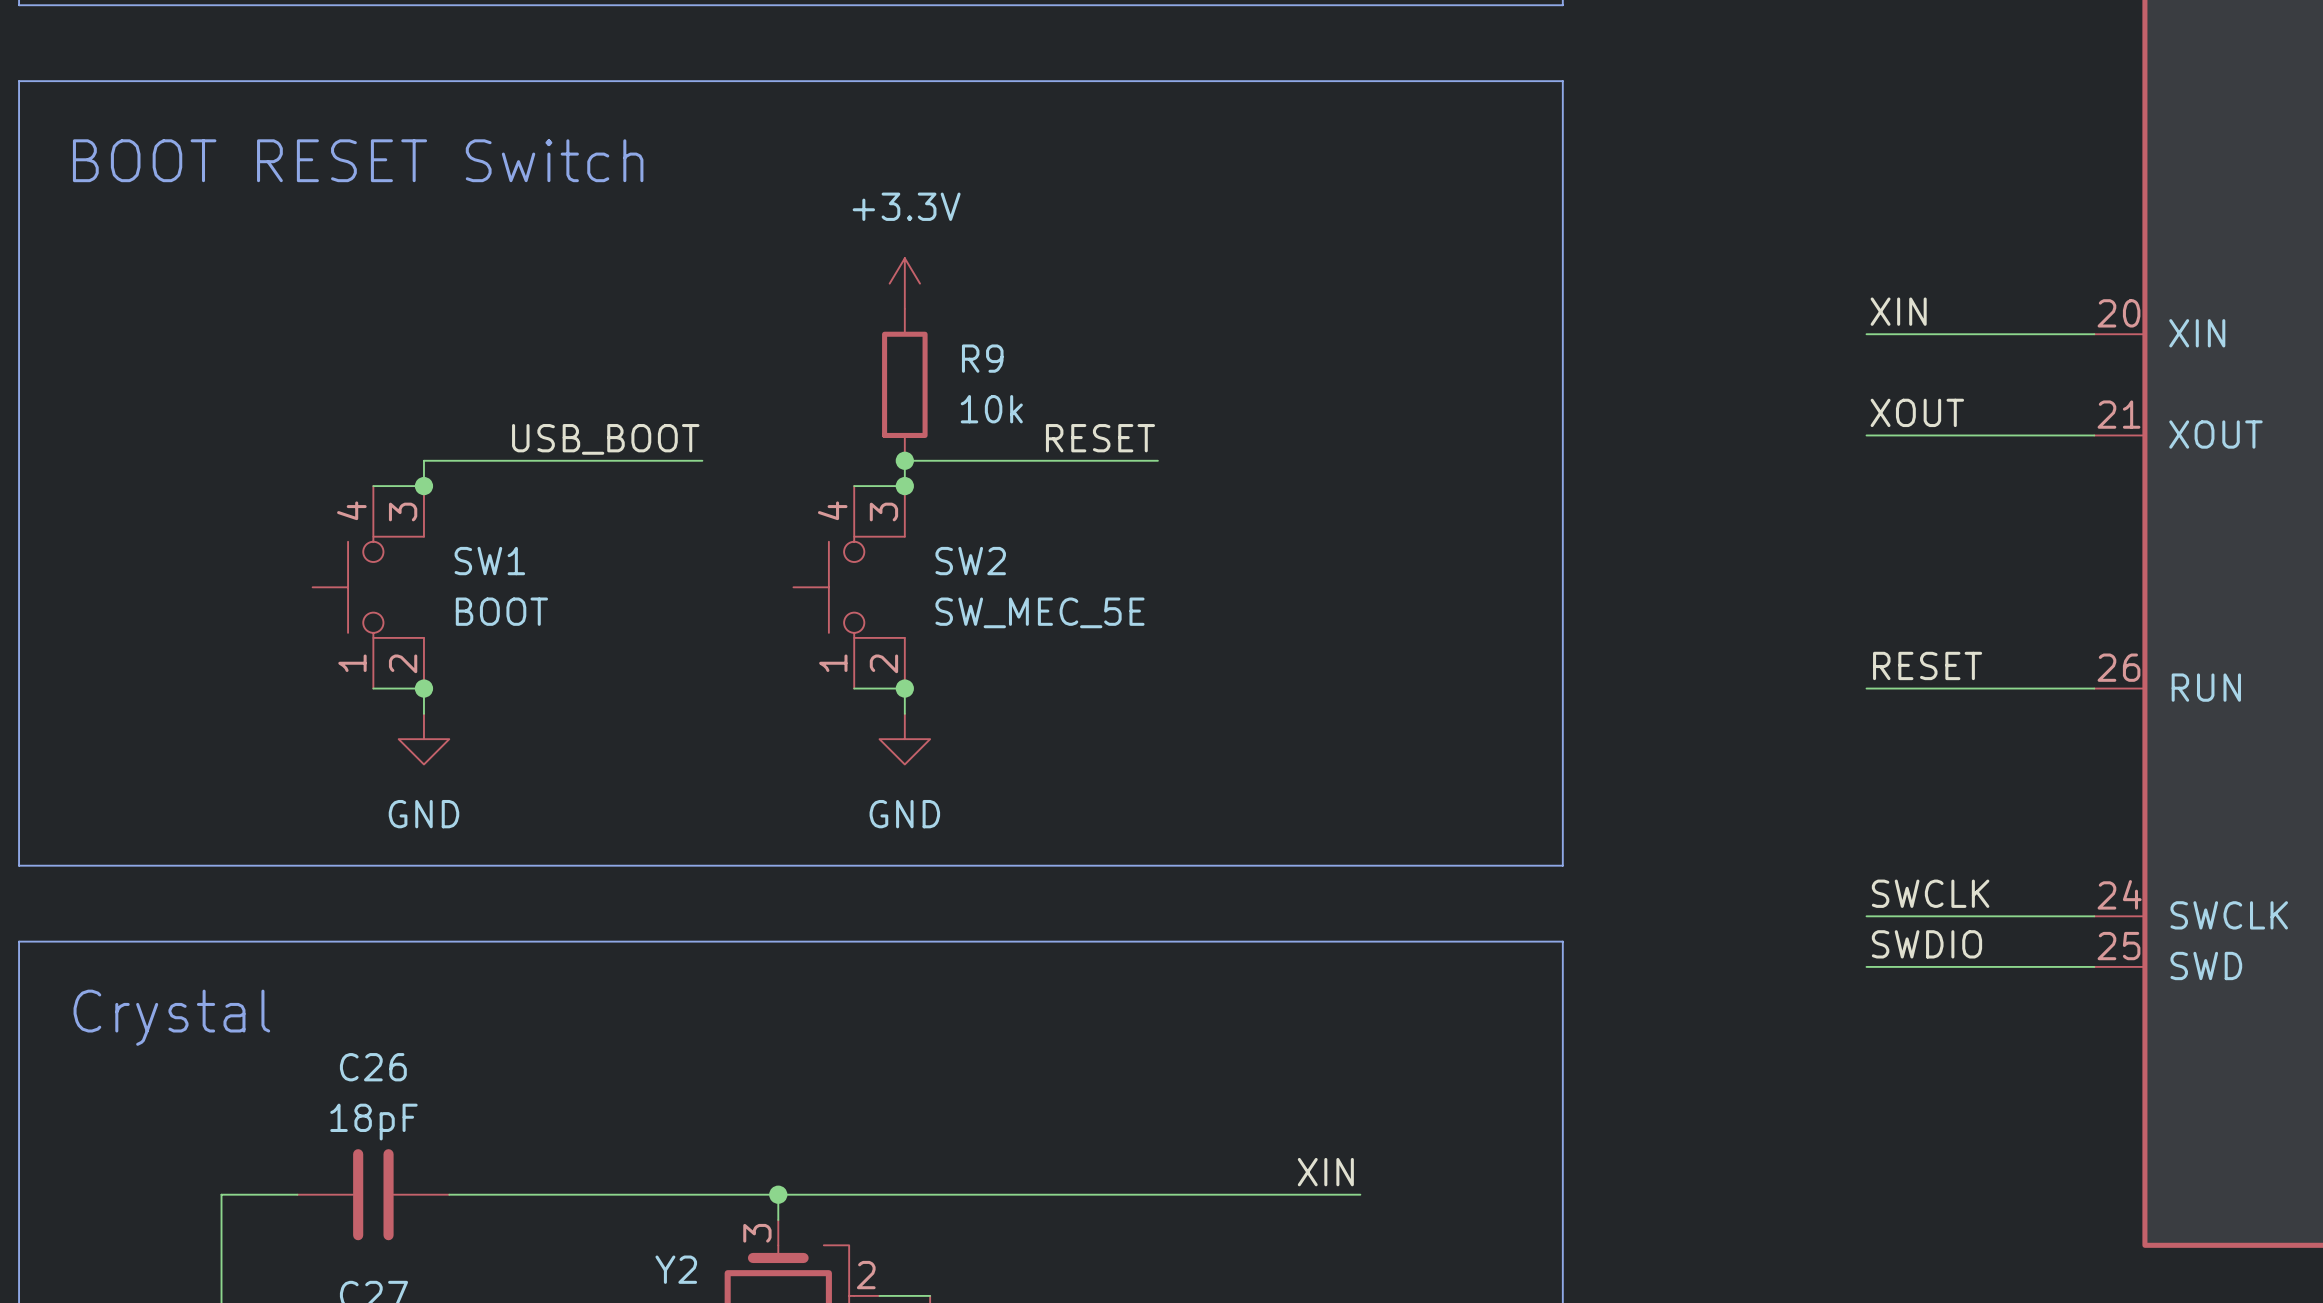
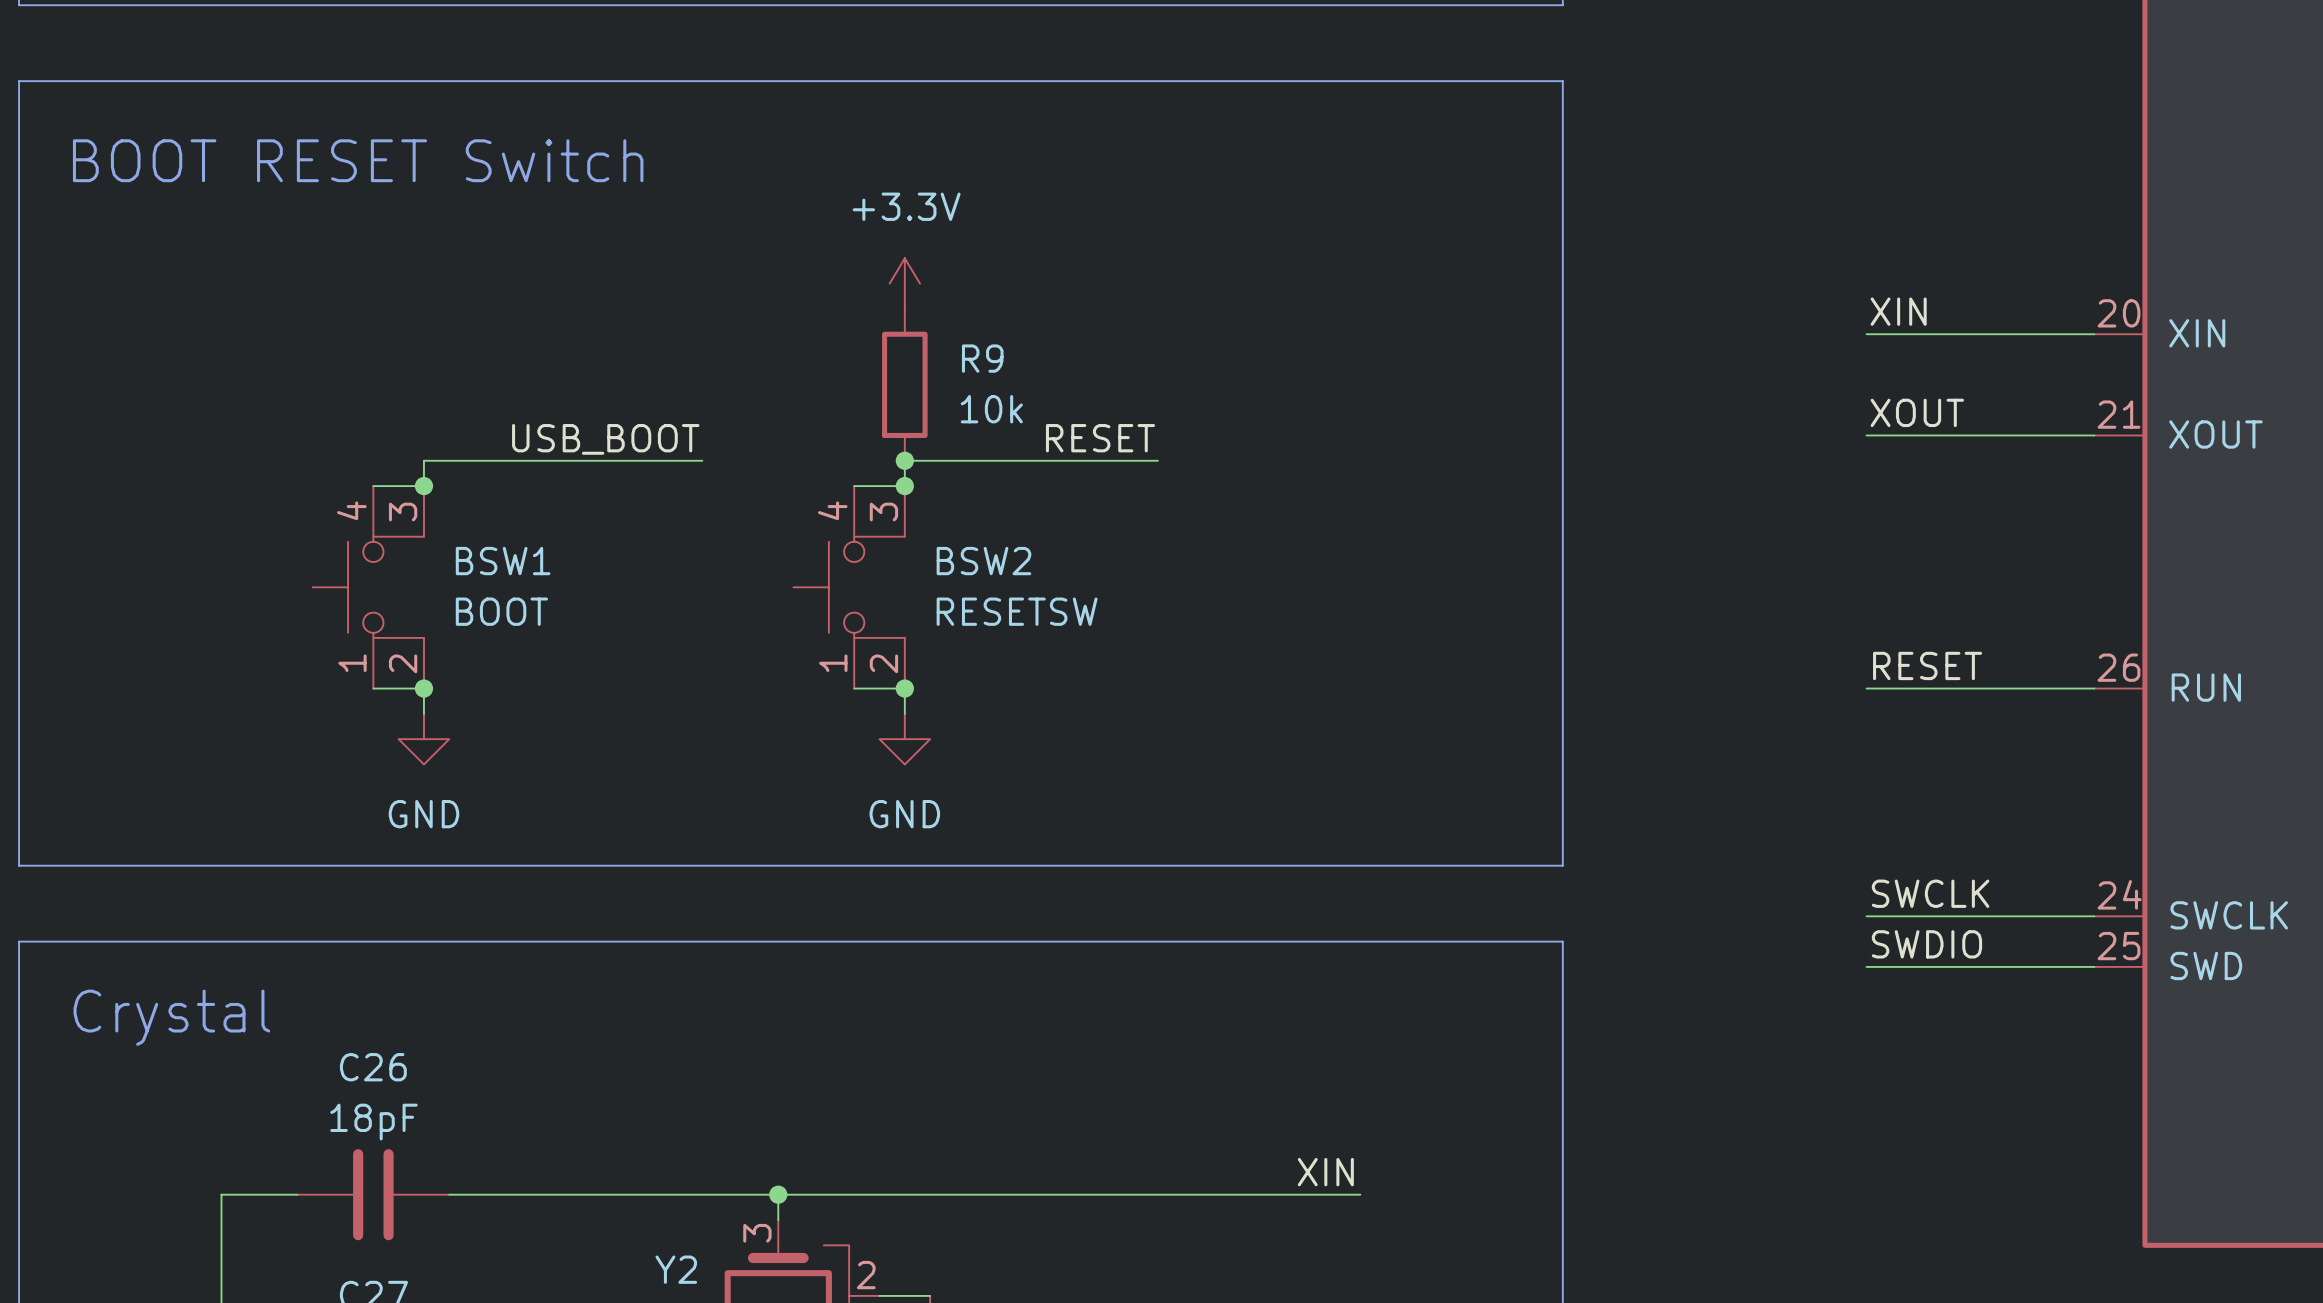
SW1 name: SW1 (489, 561) -> BSW1 (503, 561)
SW2 name: SW2 (970, 561) -> BSW2 (983, 561)
SW2 value: SW_MEC_5E (1039, 612) -> RESETSW (1017, 611)

